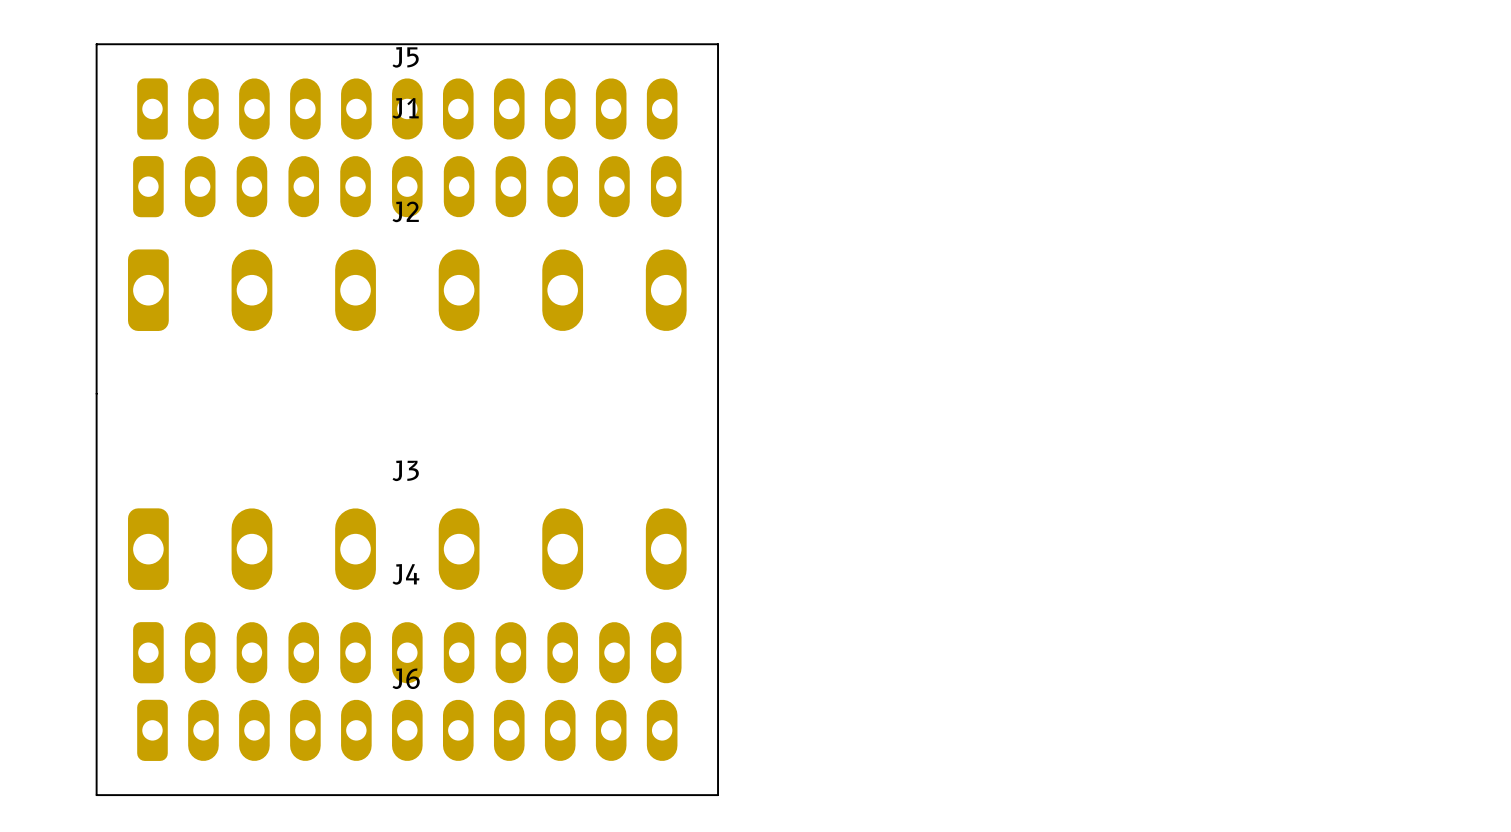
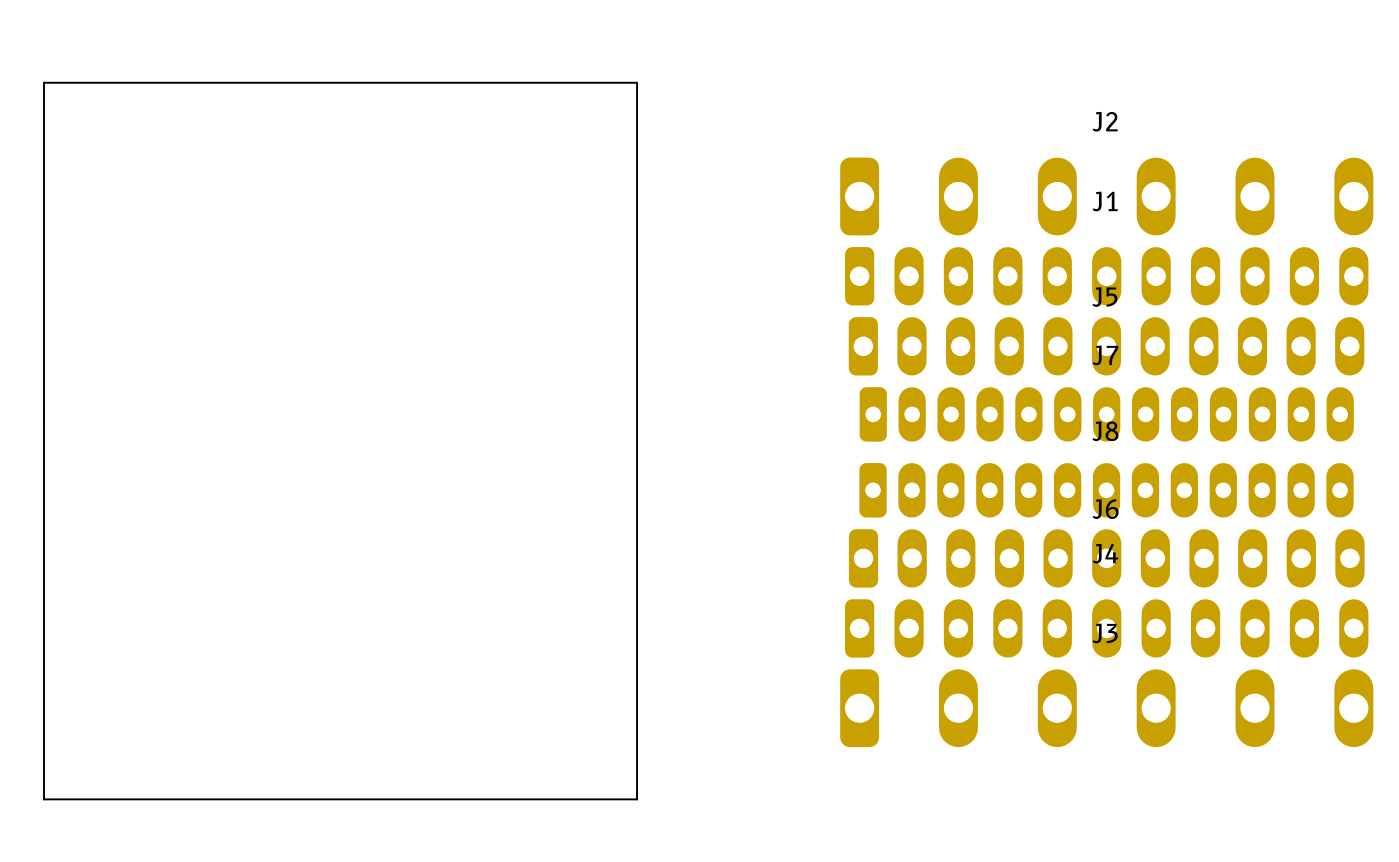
J5 position: (407, 108) -> (1106, 346)
J1 position: (407, 186) -> (1106, 276)
J2 position: (407, 290) -> (1106, 196)
J7: none -> (1106, 414)
J8: none -> (1106, 490)
J3 position: (407, 549) -> (1106, 708)
J4 position: (407, 652) -> (1106, 628)
J6 position: (407, 730) -> (1106, 558)

